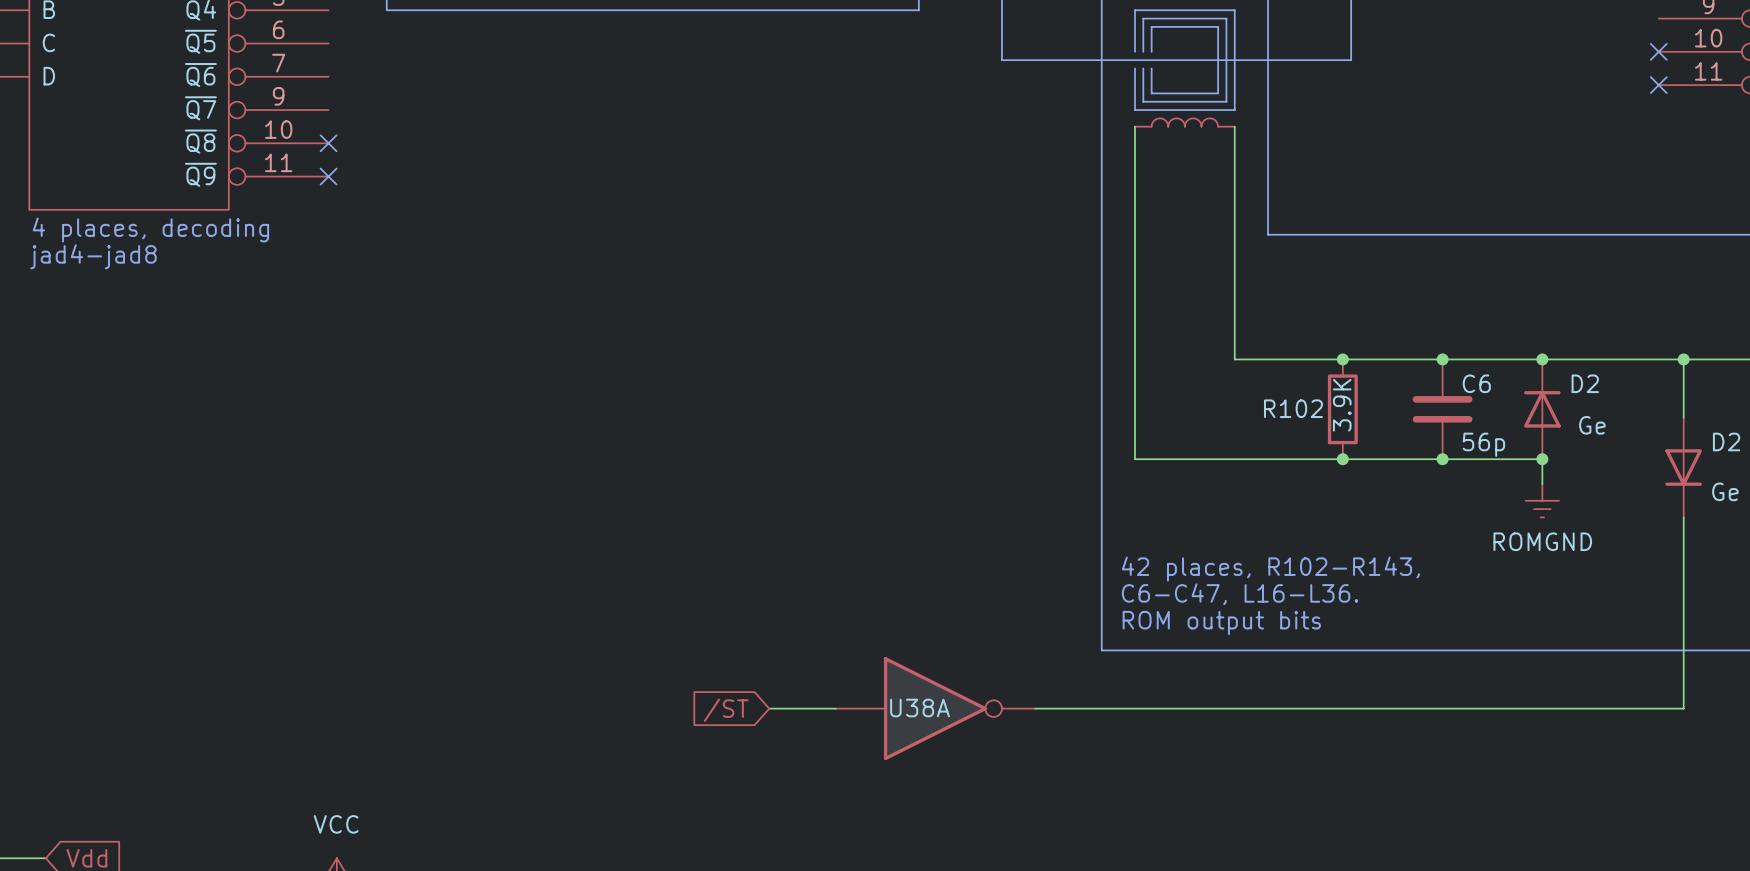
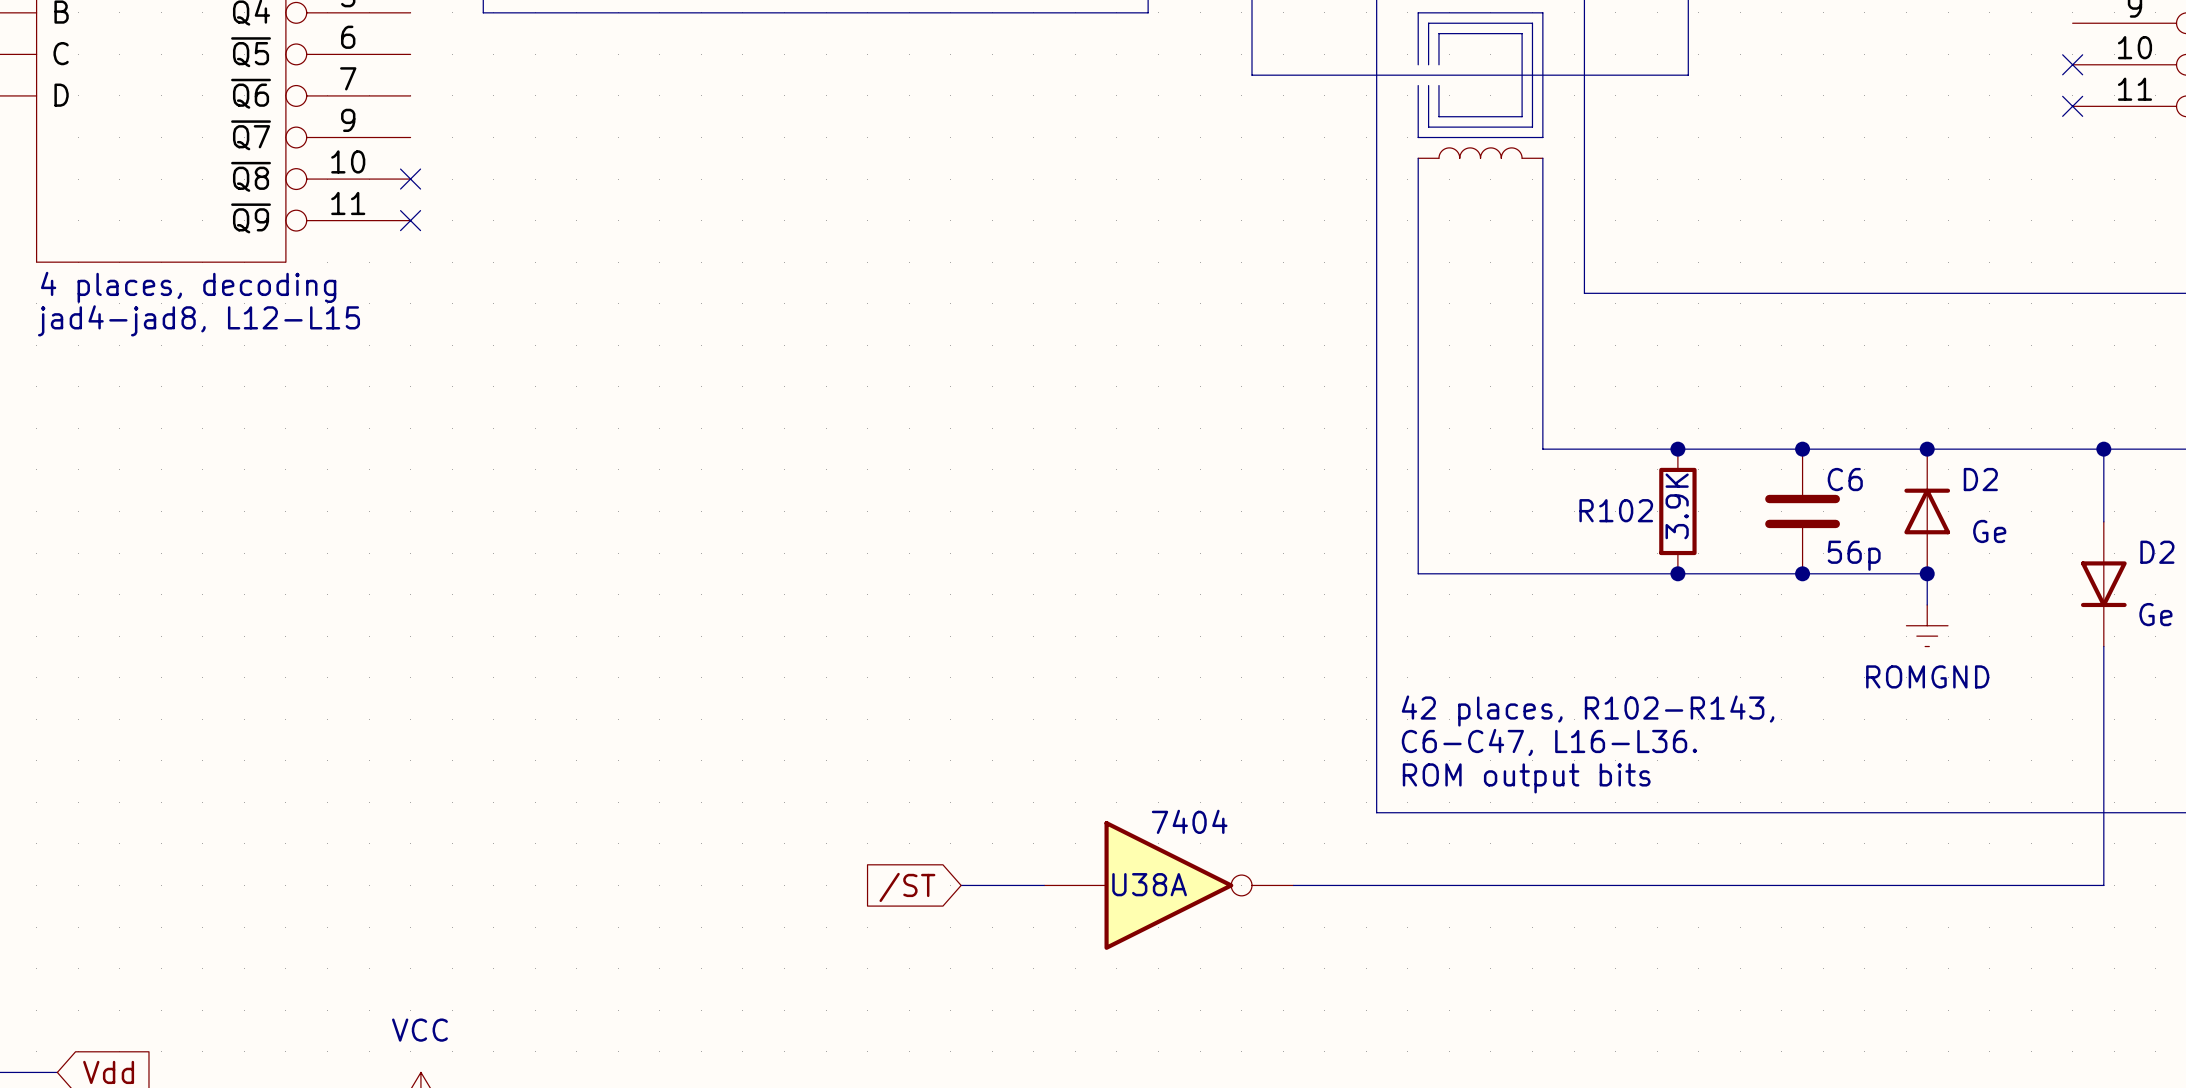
text: jad4-jad8 (93, 256) -> jad4-jad8, L12-L15 (199, 320)
U38A value: none -> 7404 (1189, 821)

